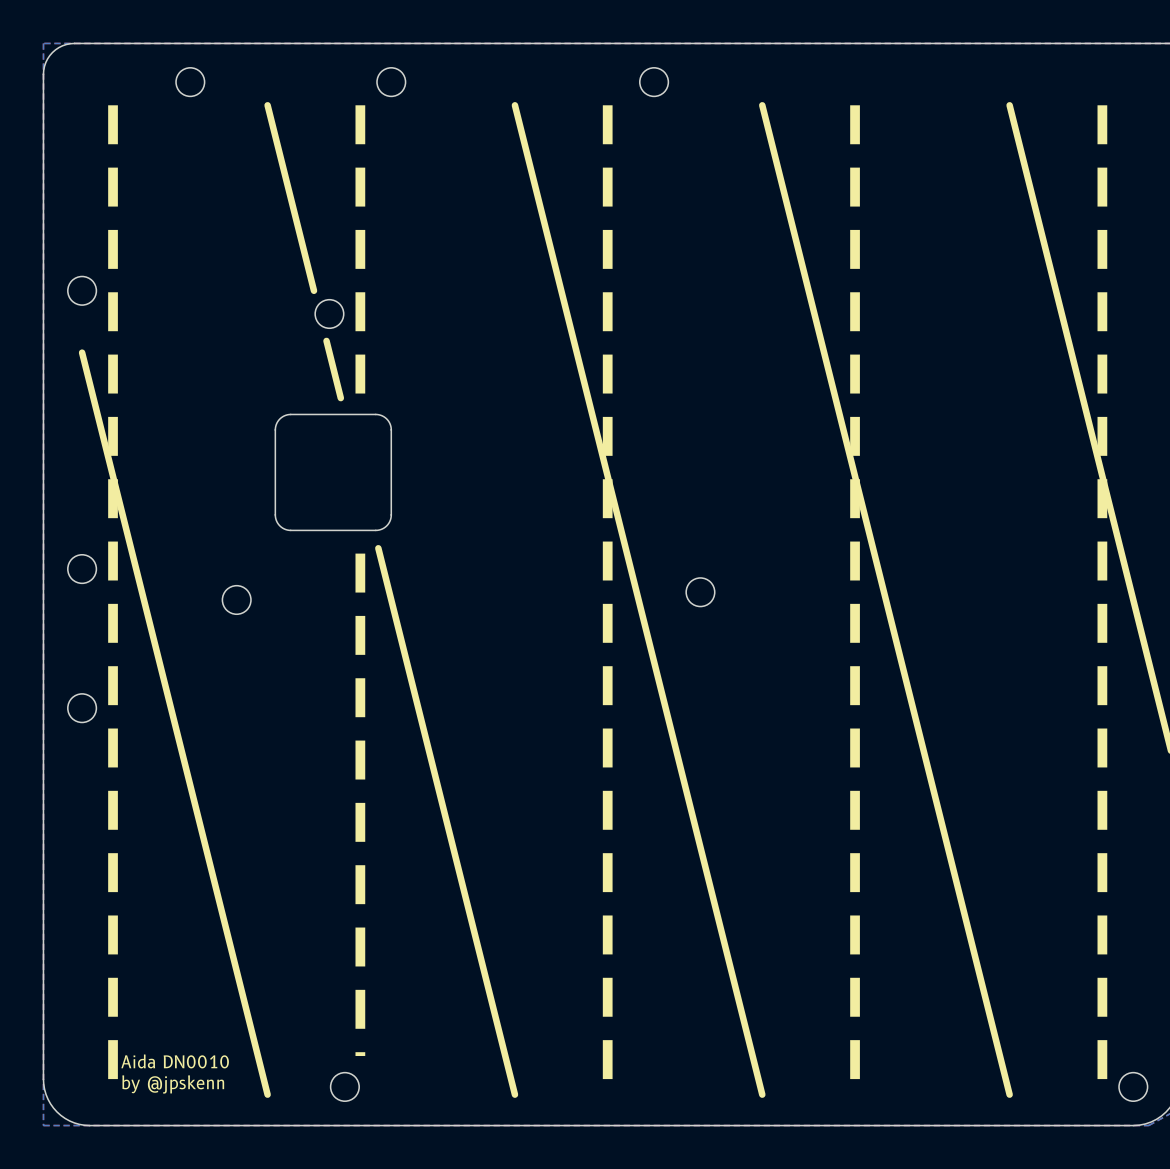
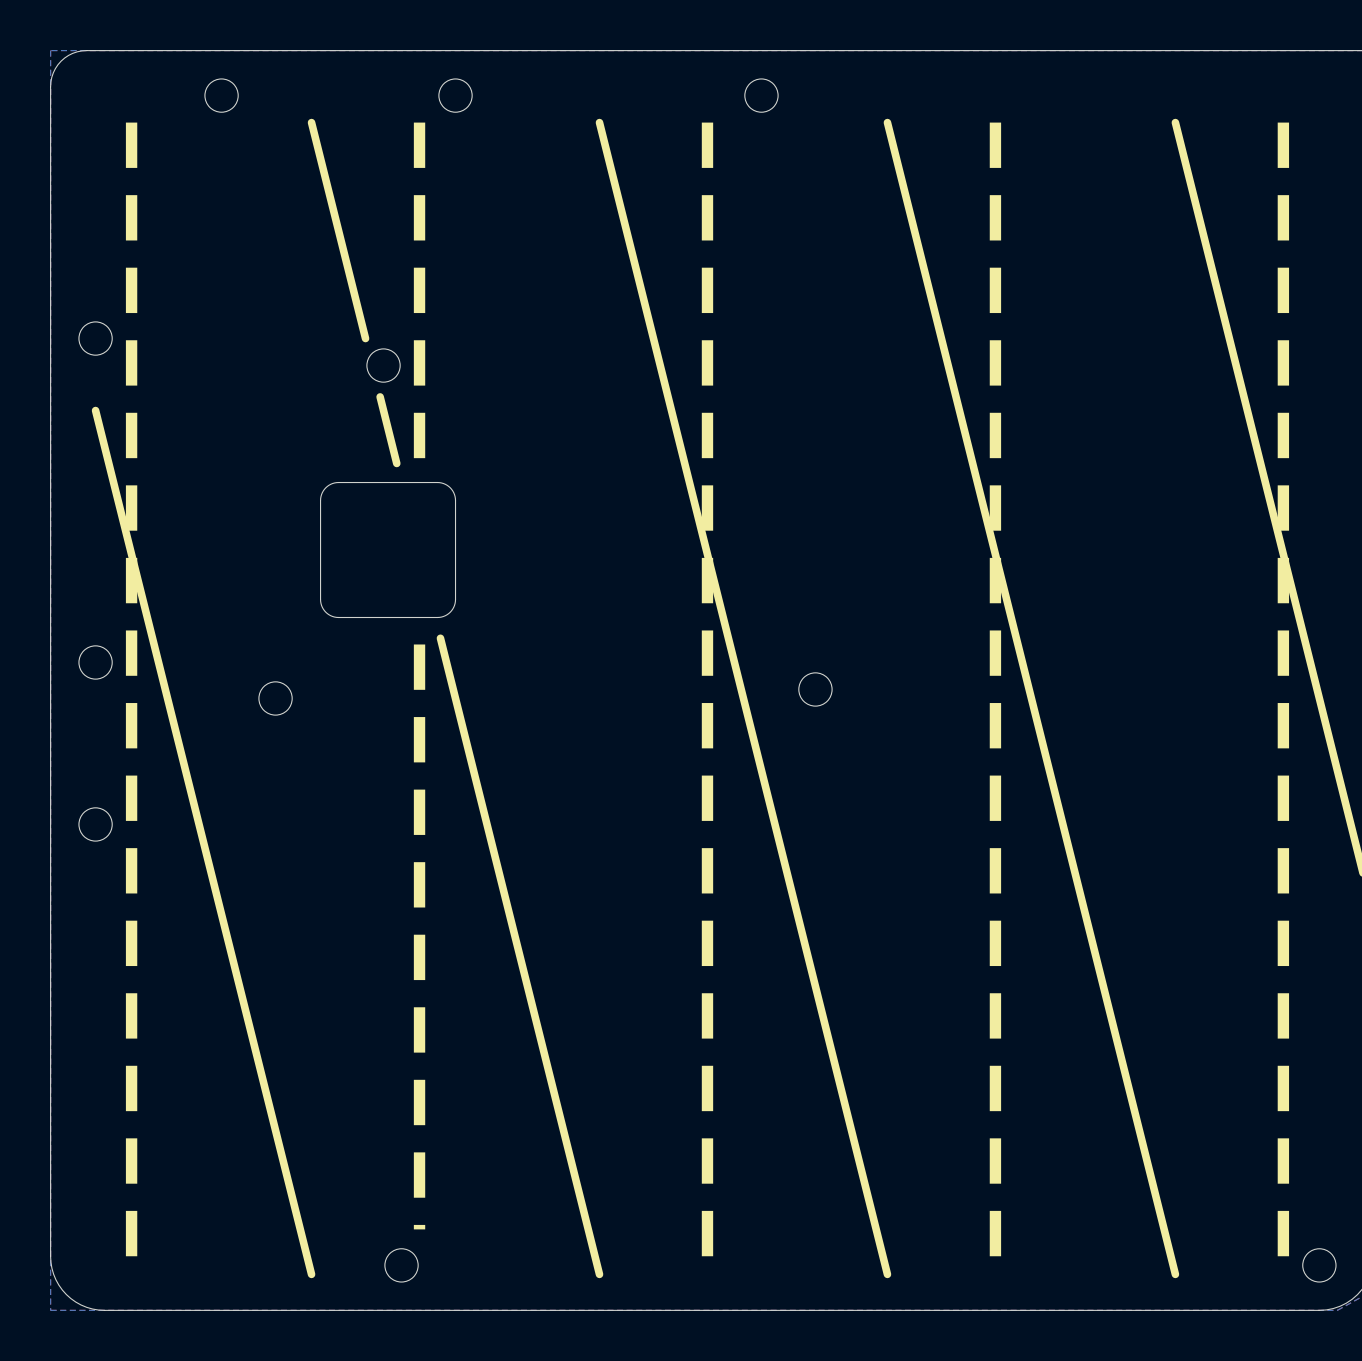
text: Aida DN0010 (175, 1061) -> none
text: by @jpskenn (173, 1084) -> none

